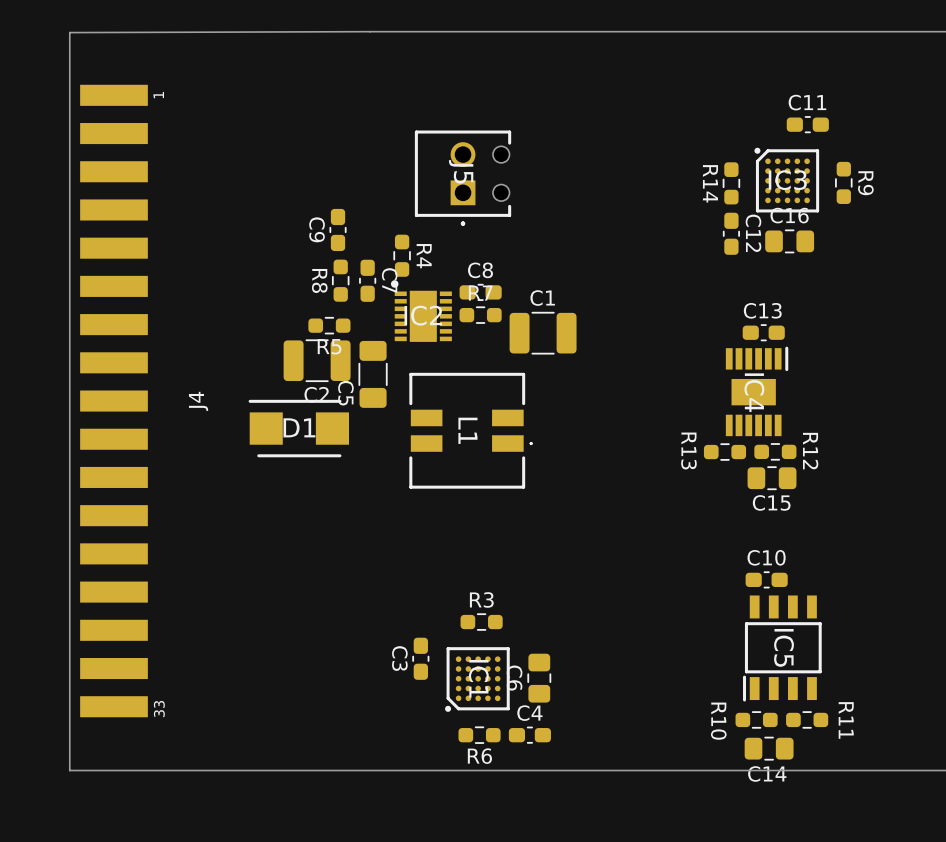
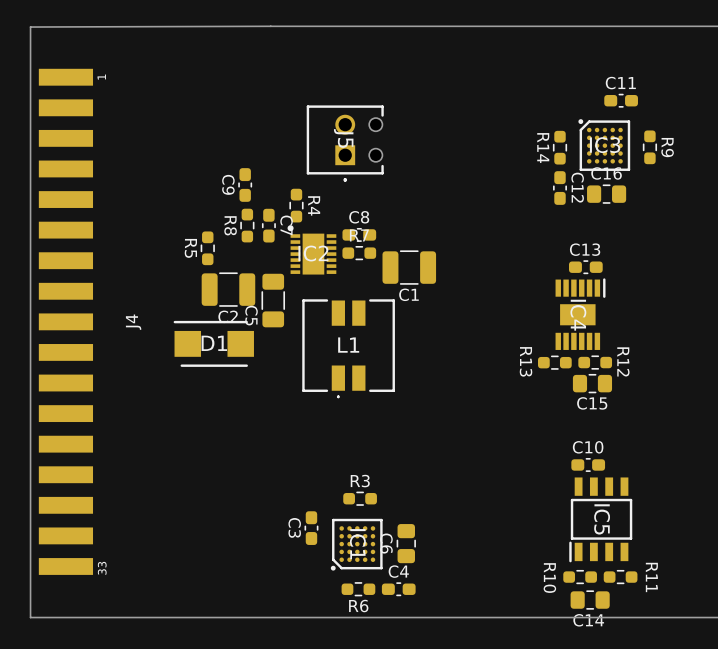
C1 name position: C1 (542, 298) -> C1 (408, 294)
R5 rotation: 0° (329, 325) -> 90° clockwise (207, 248)
R5 position: (329, 325) -> (207, 248)
L1 rotation: 0° (471, 430) -> 90° clockwise (348, 348)

